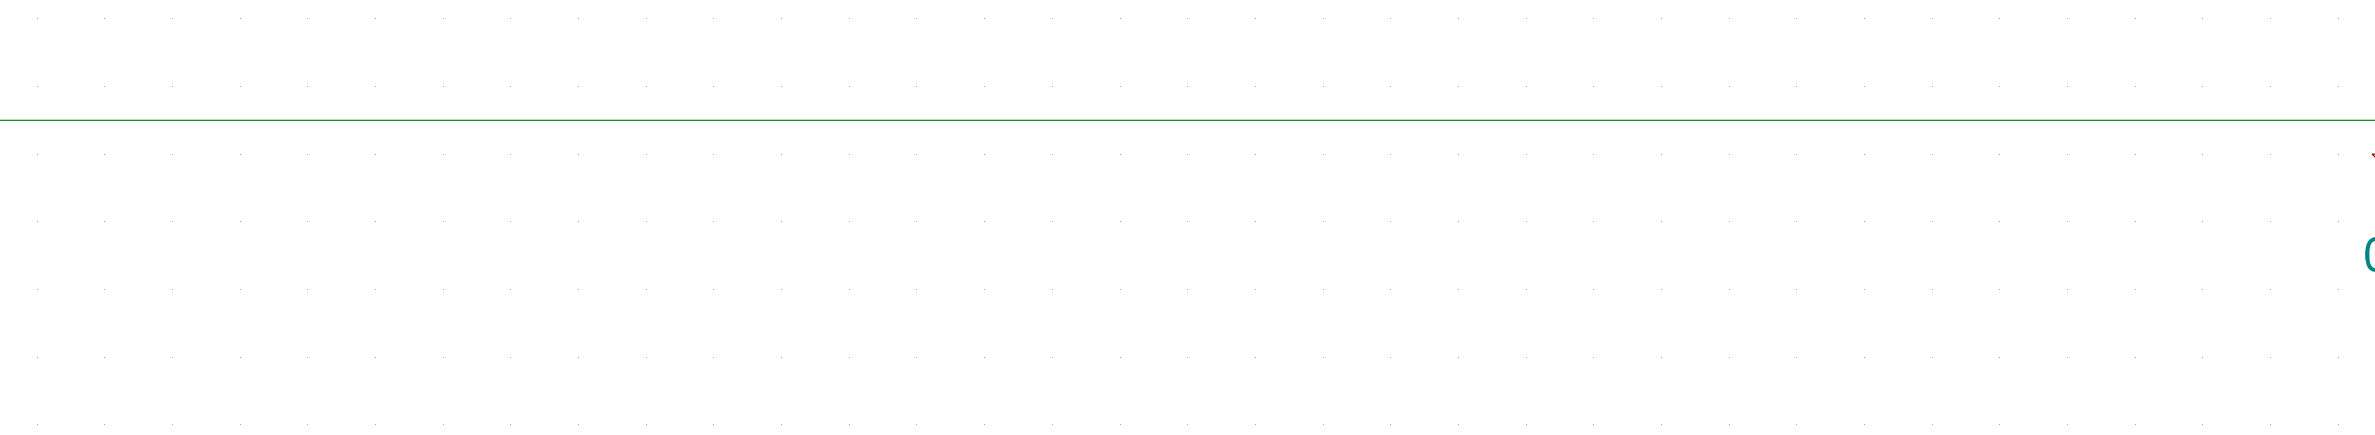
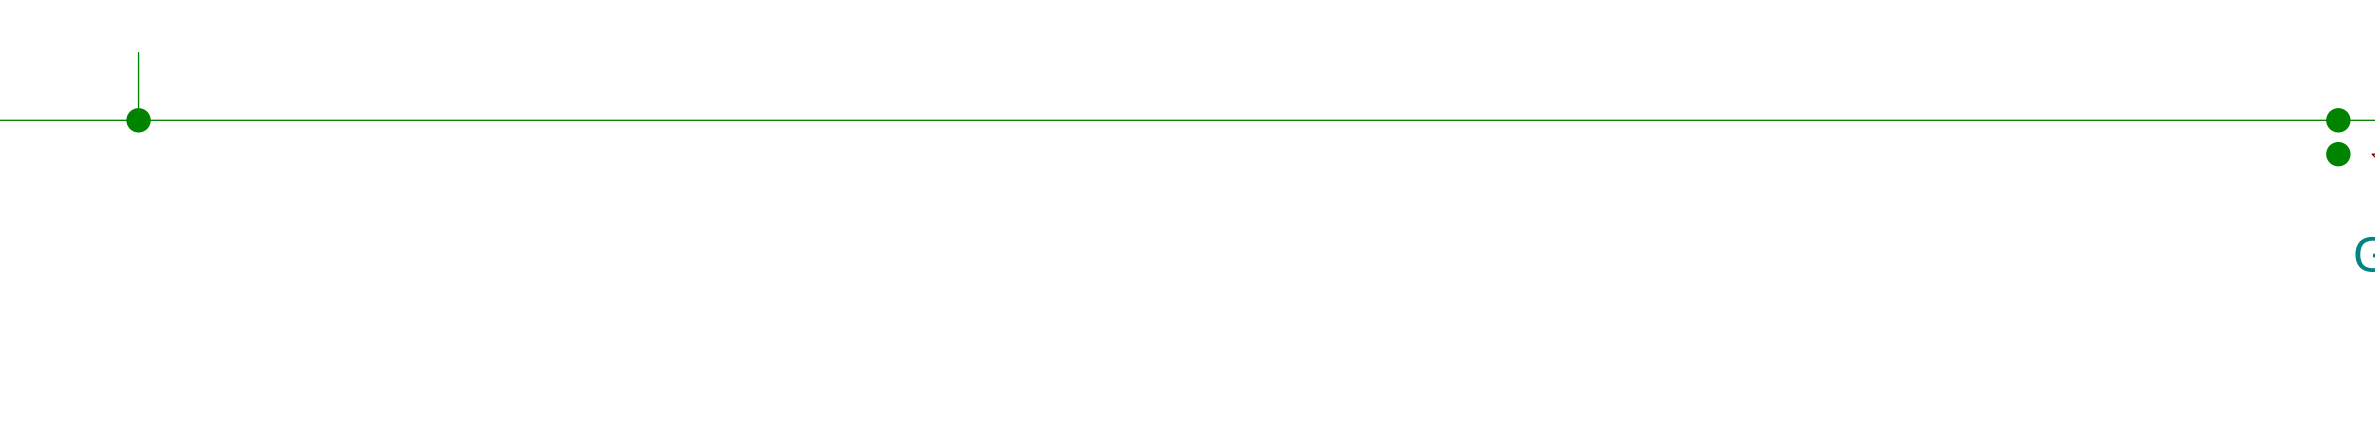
wire: none -> (138, 52) (138, 120)
junction: none -> (138, 120)
junction: none -> (2338, 120)
junction: none -> (2338, 154)

